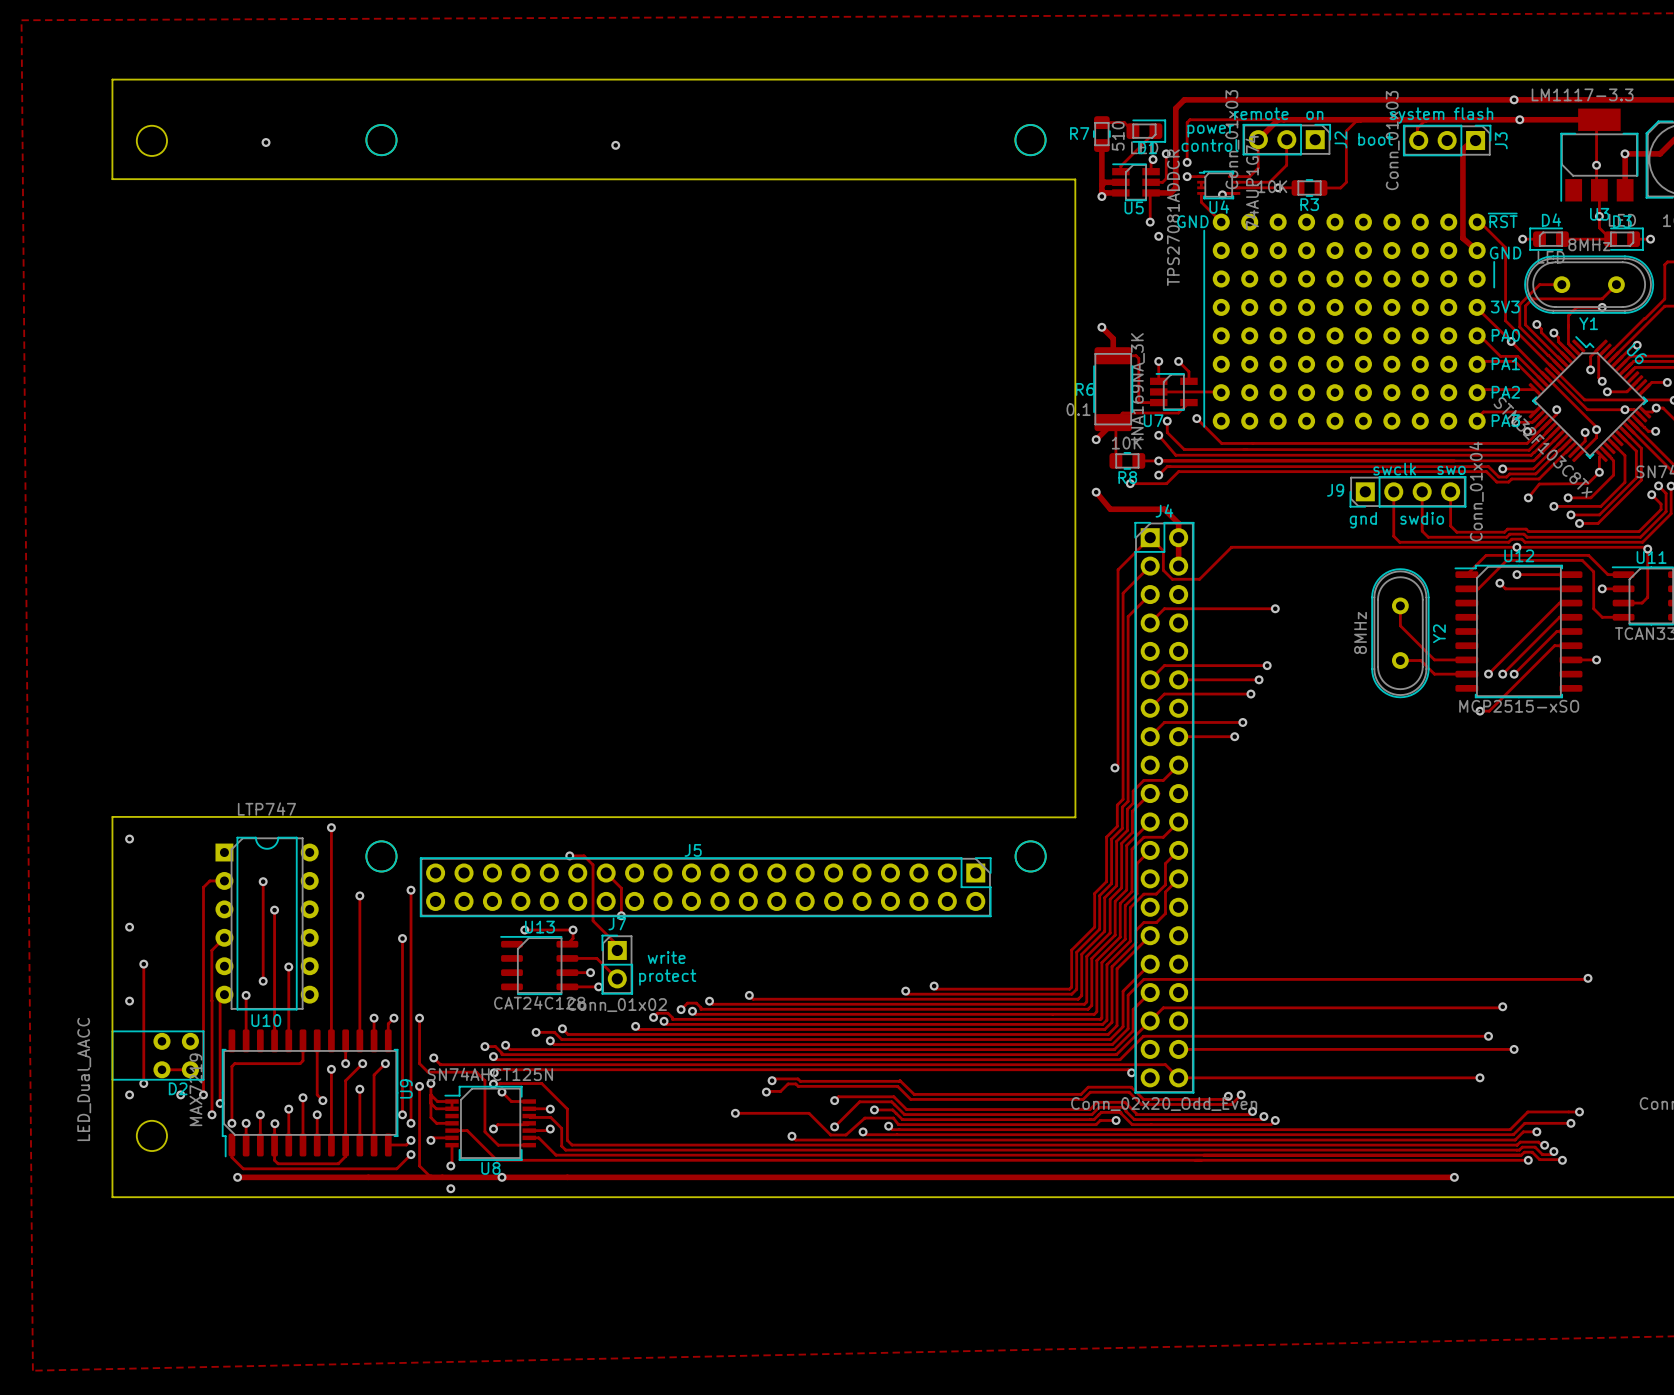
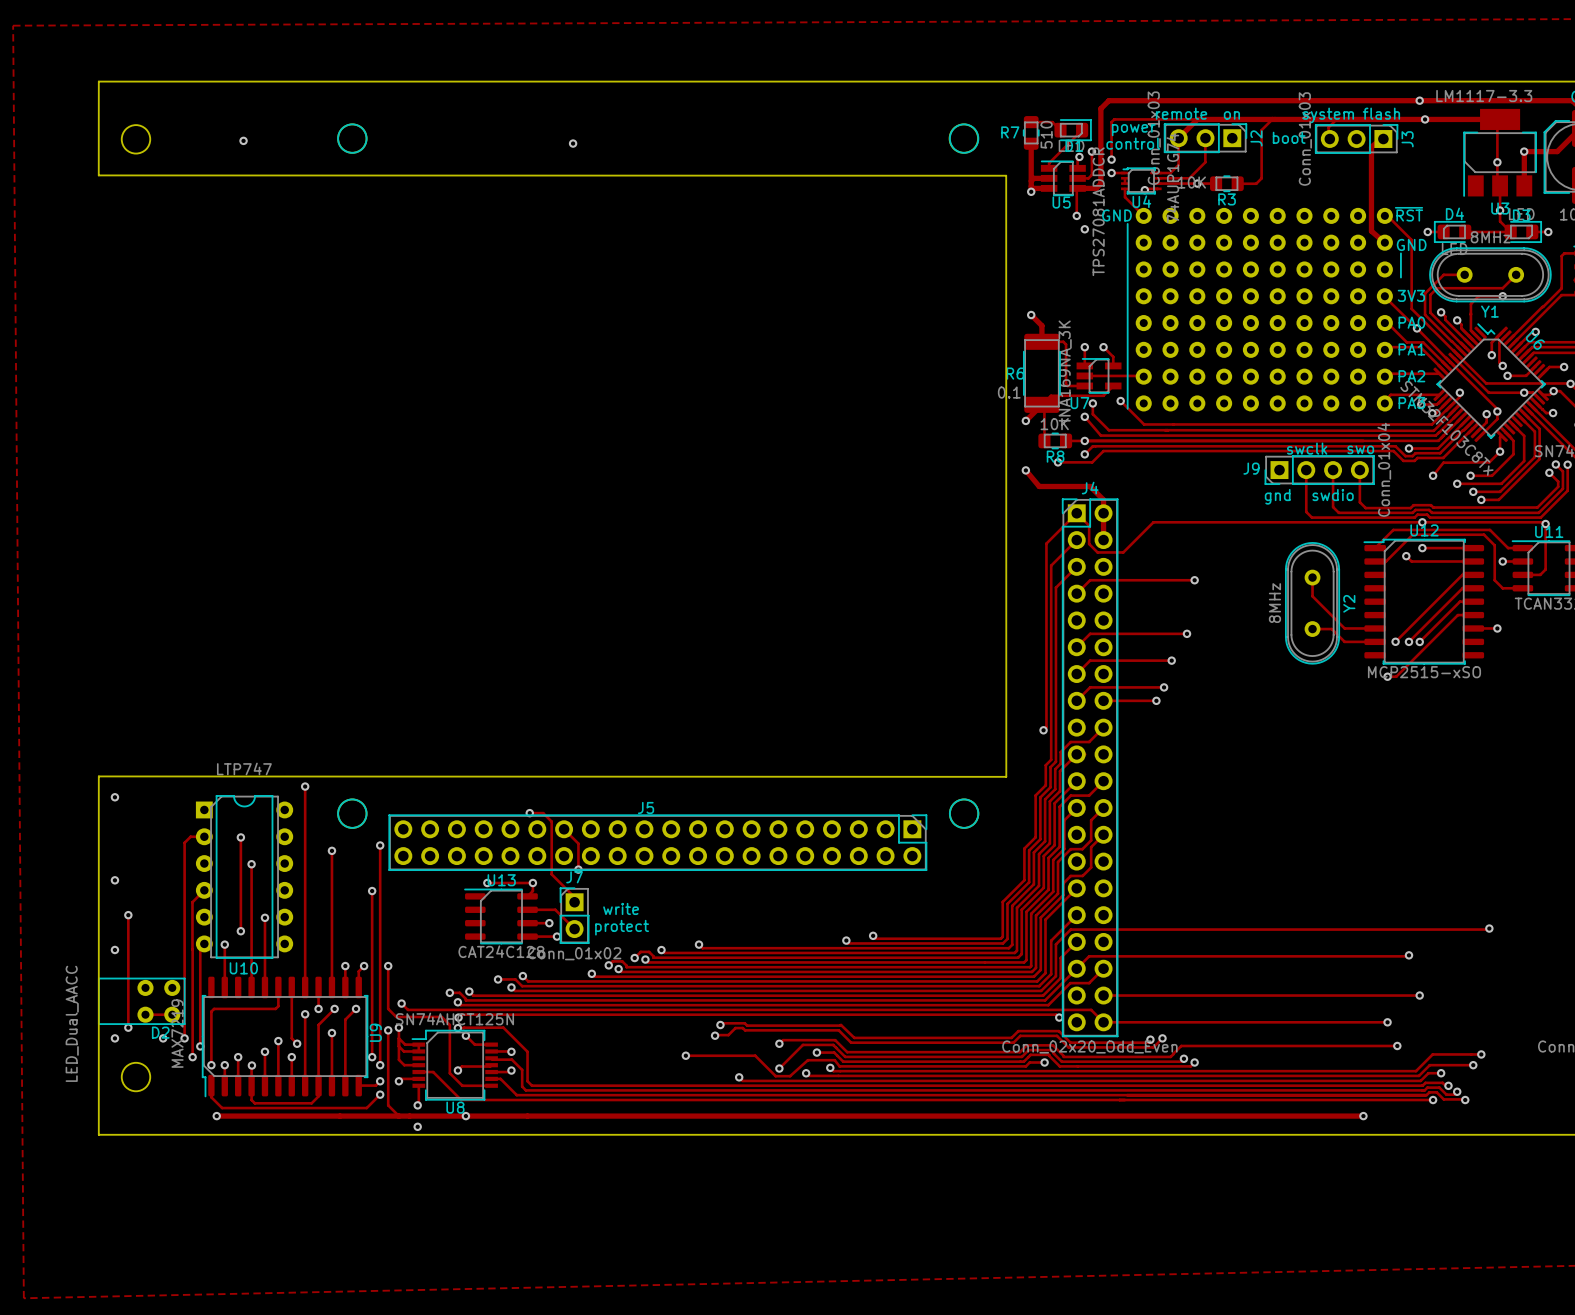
track: (1178, 679) (1259, 679) -> none
via: (1259, 679) -> none
track: (1163, 1036) (1488, 1036) -> (1089, 983) (1103, 968)
via position: (1488, 1036) -> (1397, 1045)
track: none -> (1397, 1045) (1181, 1045) (1173, 1054)
via: (1252, 1111) -> none

